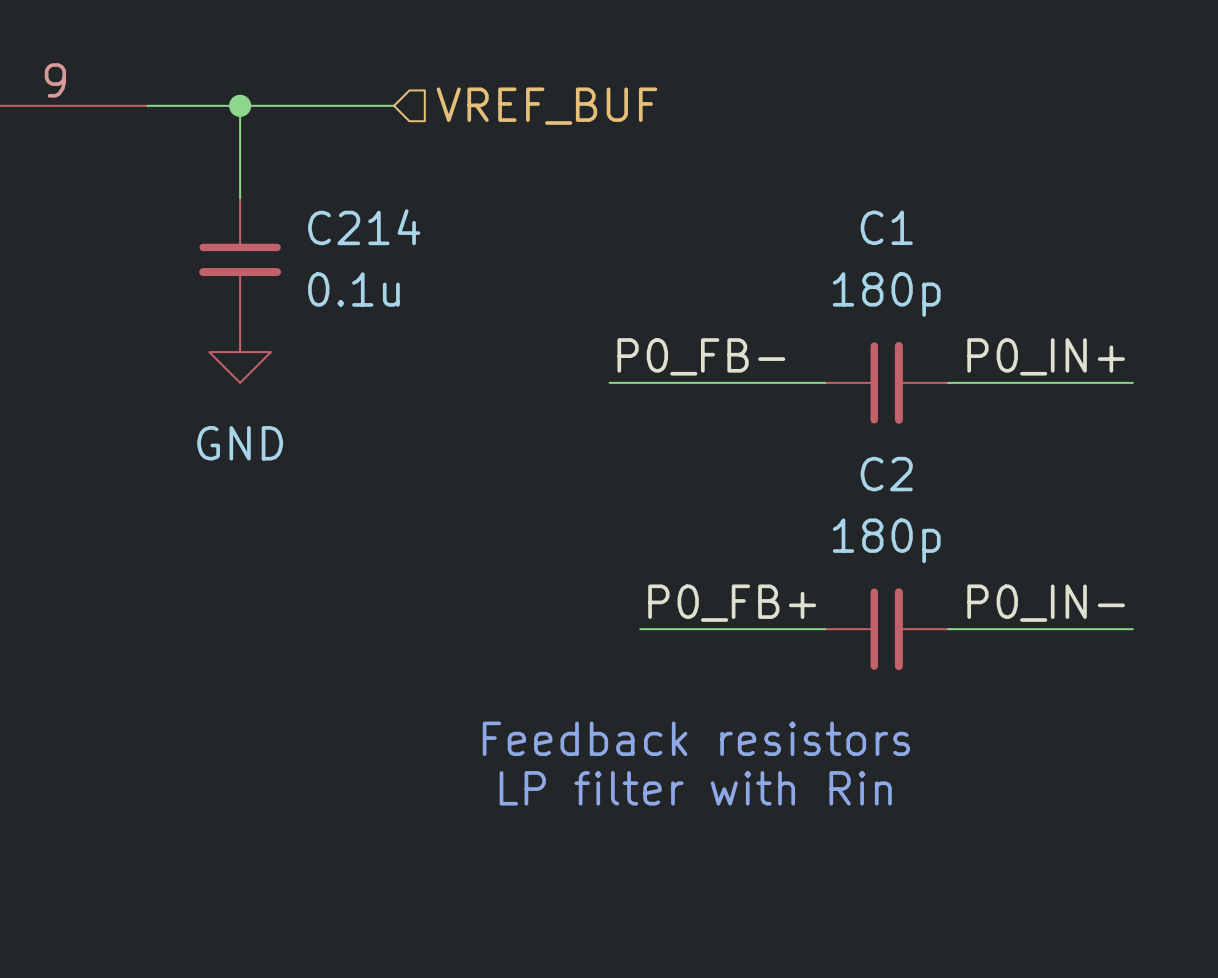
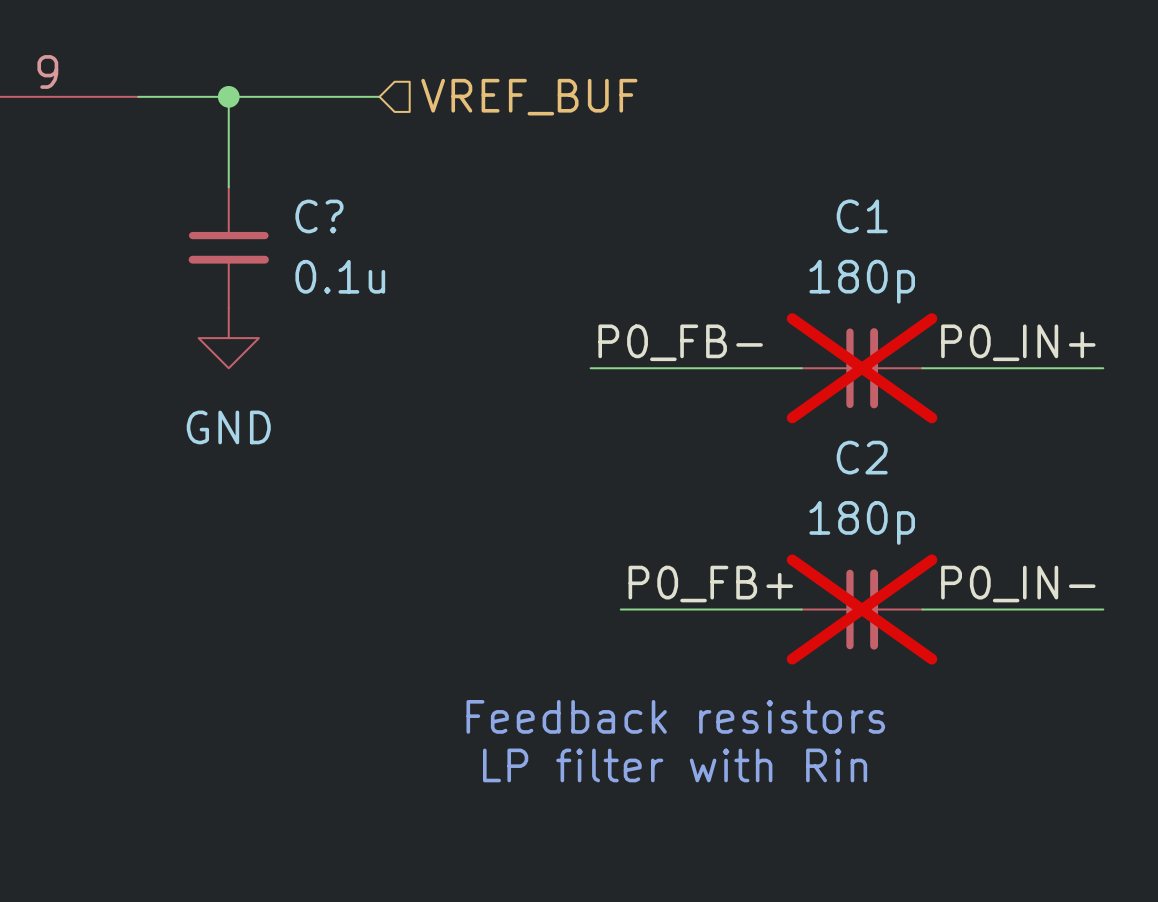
C214 name: C214 (364, 227) -> C? (319, 216)
C1 do-not-place cross: none -> (862, 368)
C2 do-not-place cross: none -> (862, 609)

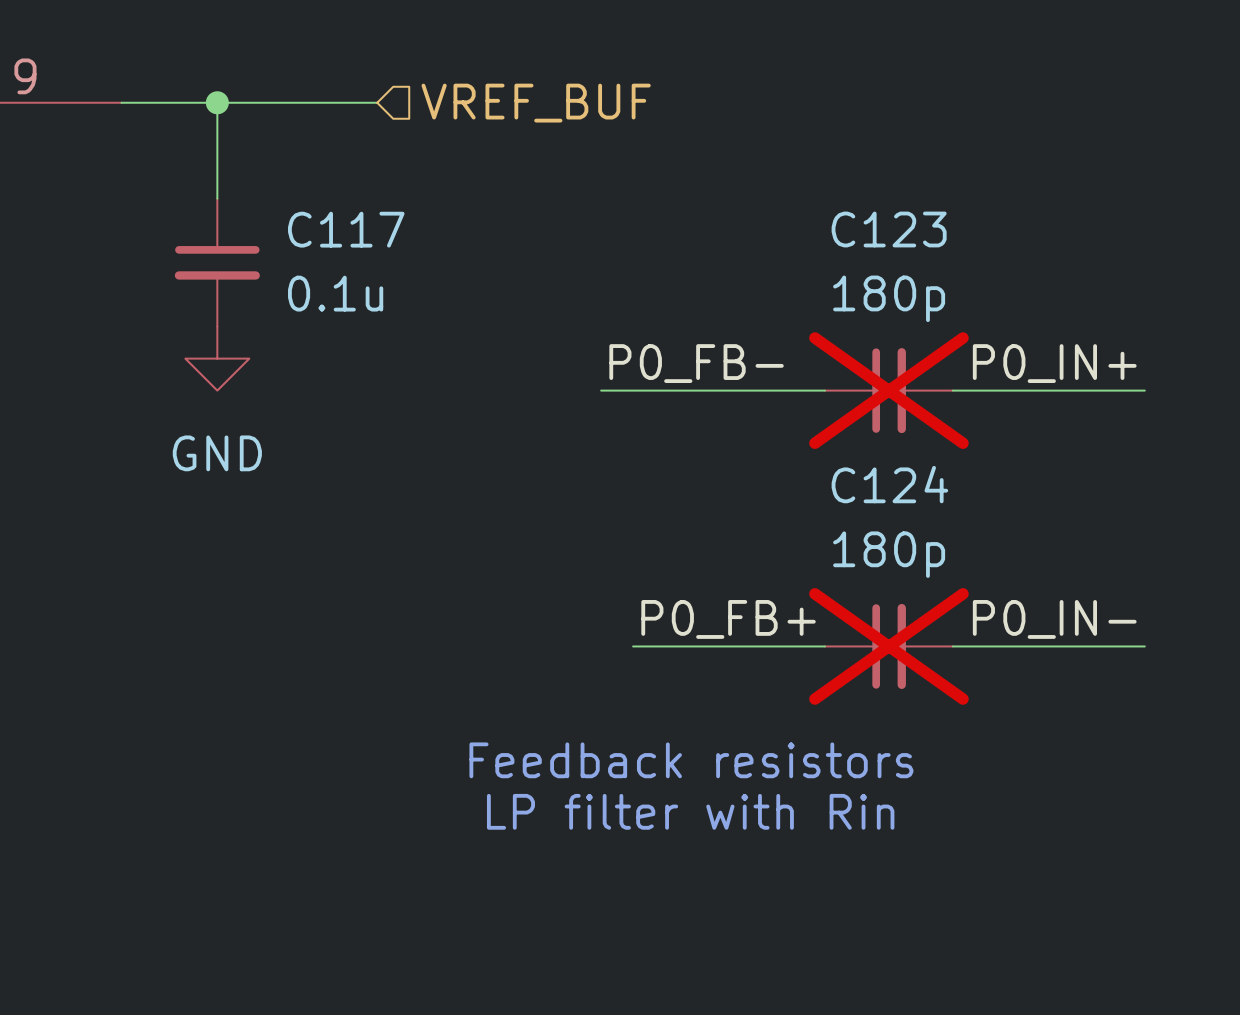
C? name: C? (319, 216) -> C117 (346, 229)
C1 name: C1 (862, 216) -> C123 (889, 229)
C2 name: C2 (862, 457) -> C124 (889, 484)

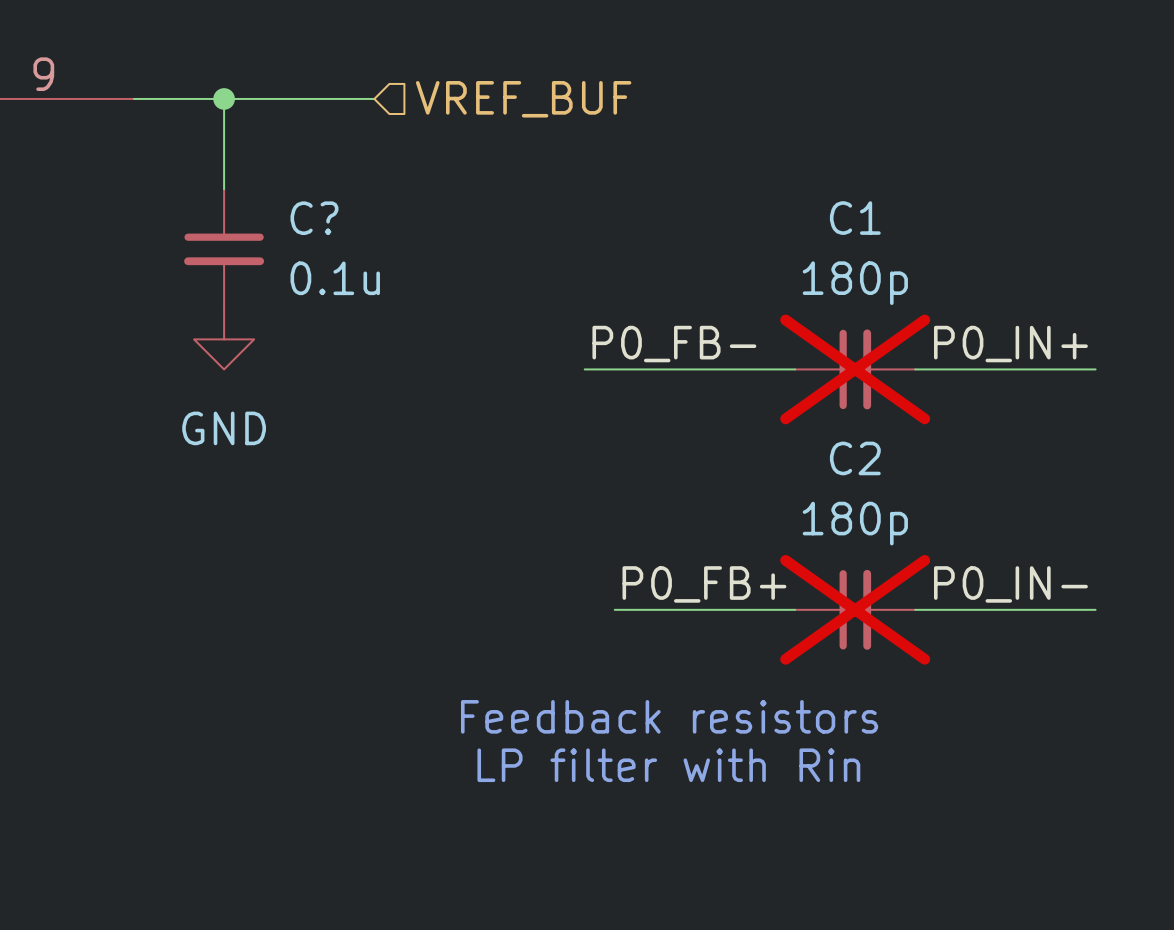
C117 name: C117 (346, 229) -> C? (314, 218)
C123 name: C123 (889, 229) -> C1 (855, 218)
C124 name: C124 (889, 484) -> C2 (855, 458)

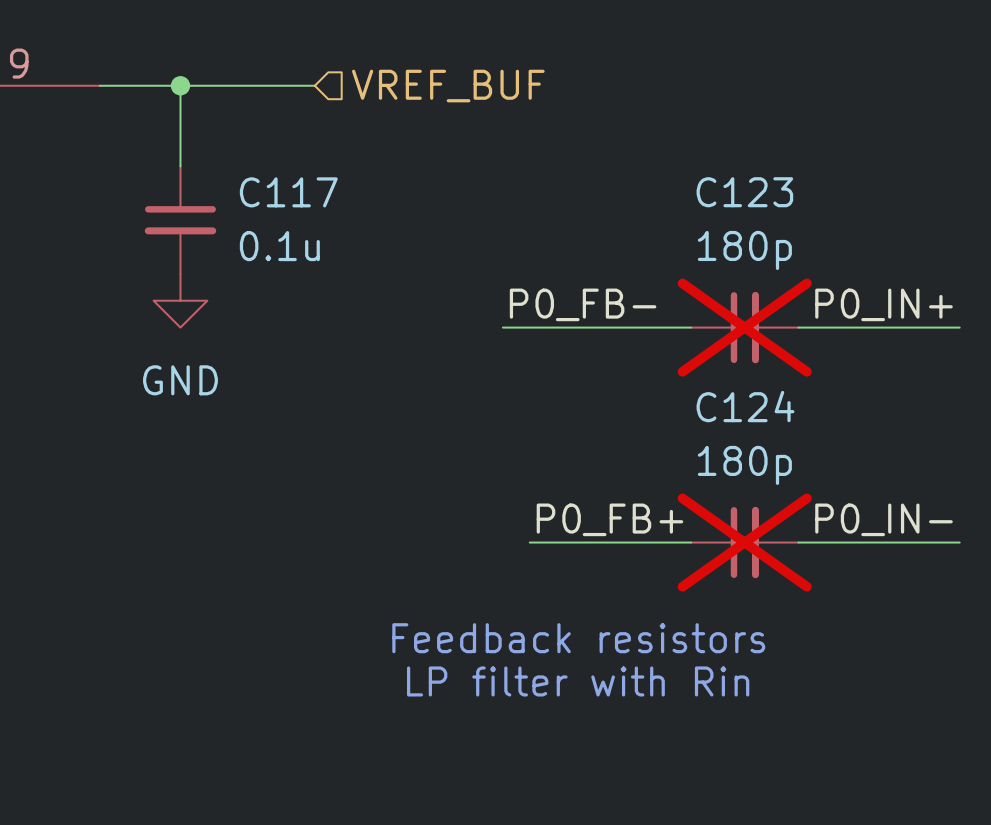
C? name: C? (314, 218) -> C117 (288, 192)
C1 name: C1 (855, 218) -> C123 (744, 192)
C2 name: C2 (855, 458) -> C124 (745, 406)

